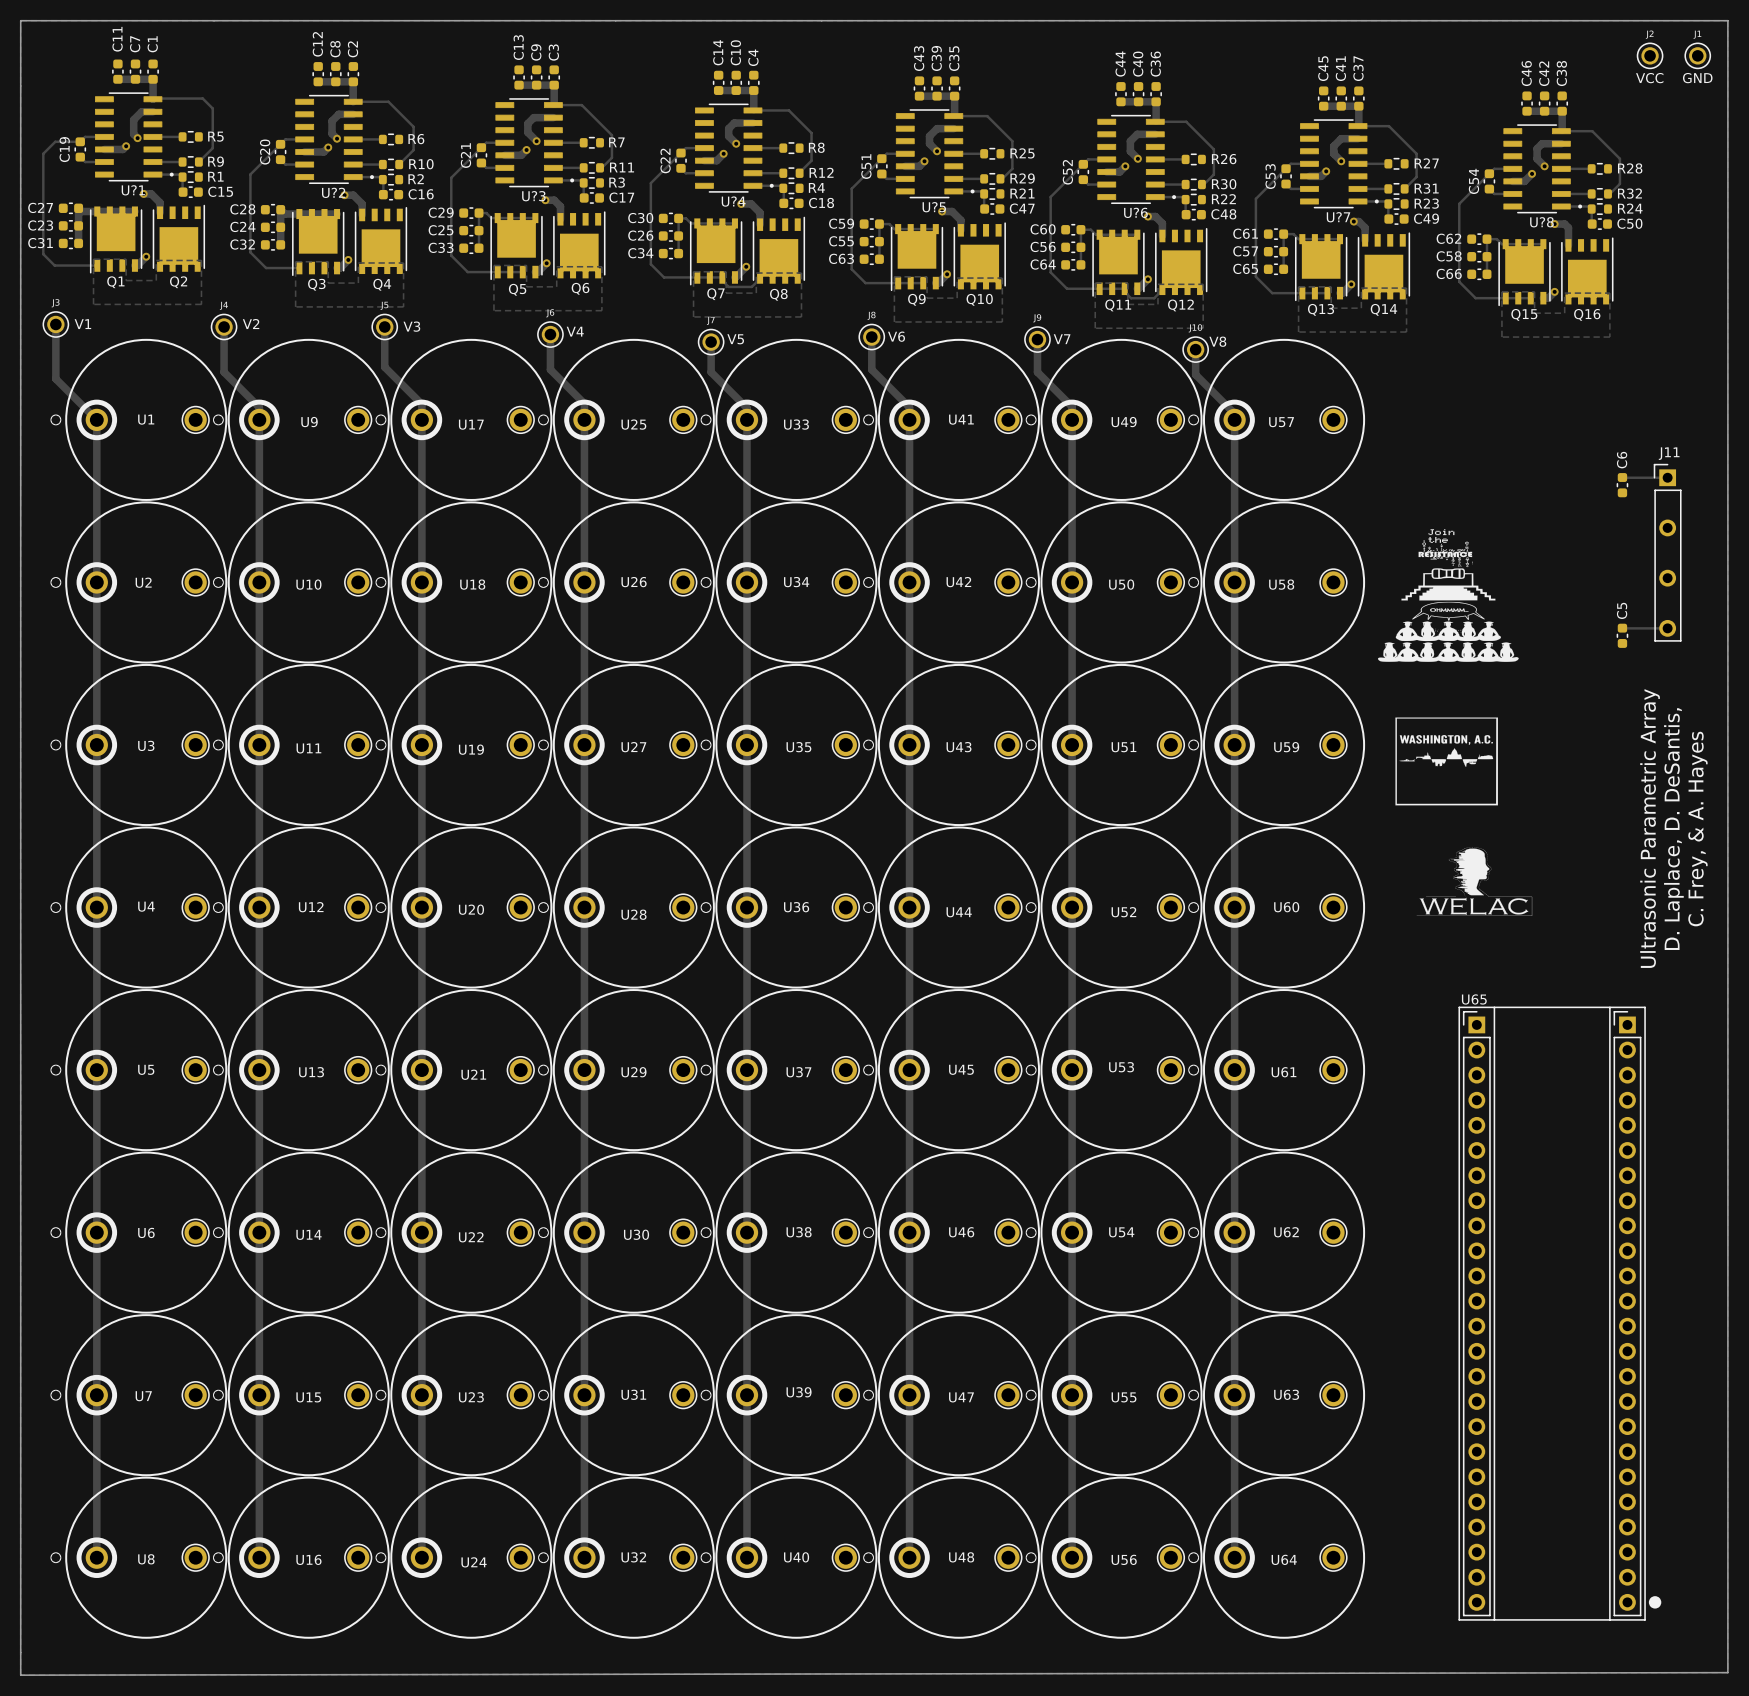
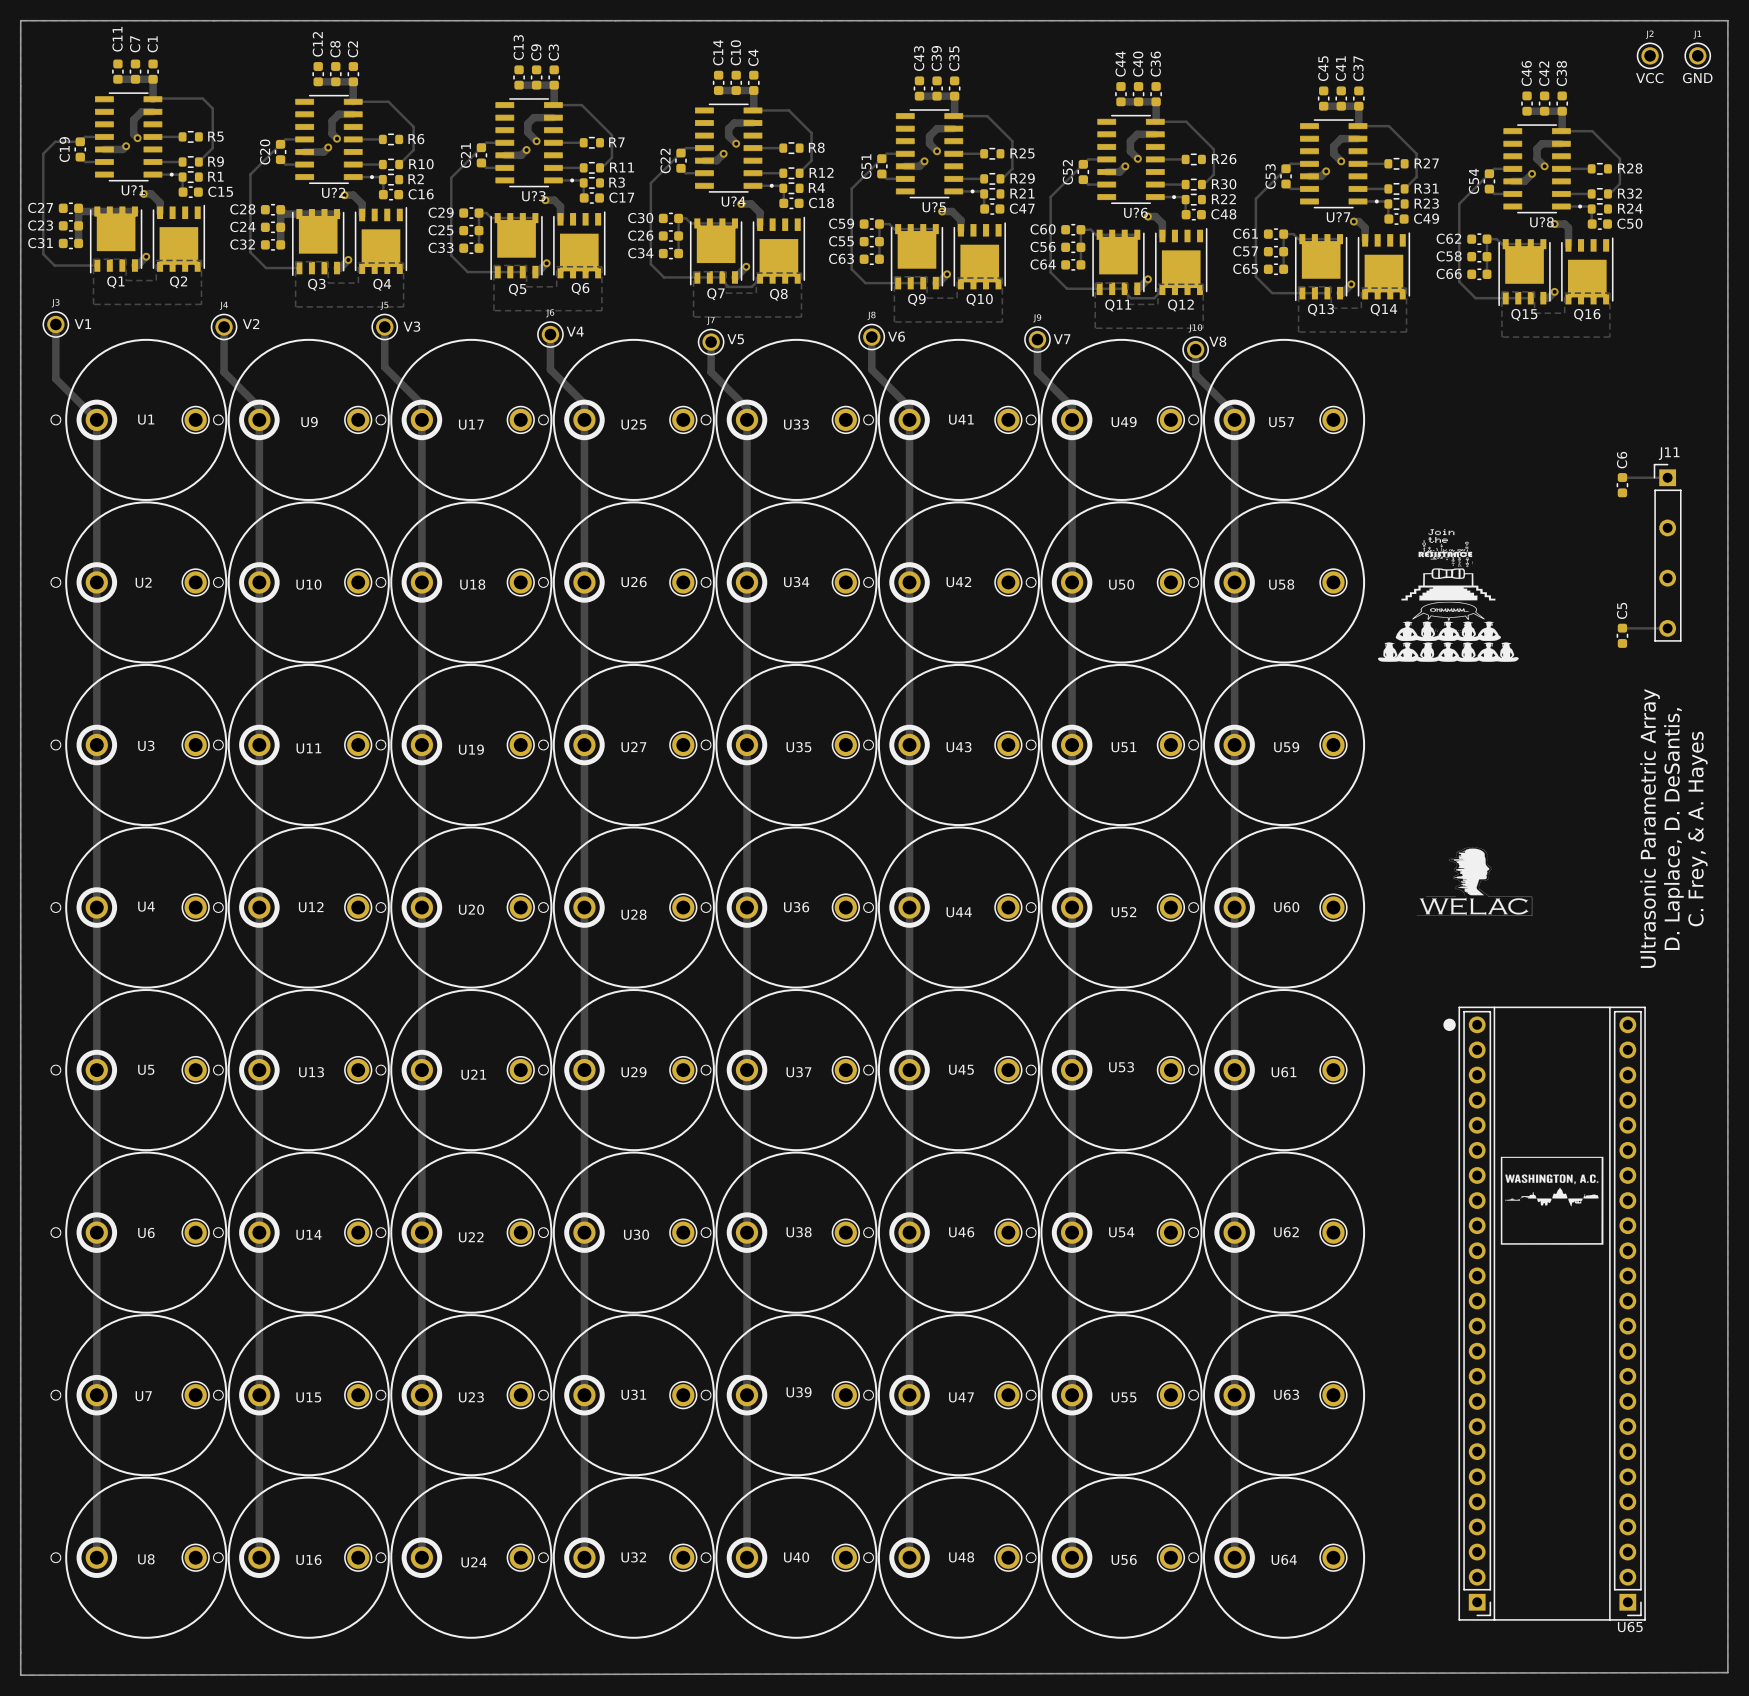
drawing: [1395, 717, 1498, 806] -> none
drawing: none -> [1500, 1156, 1604, 1245]
U65 rotation: 0° (1562, 1313) -> 180° (1542, 1313)

